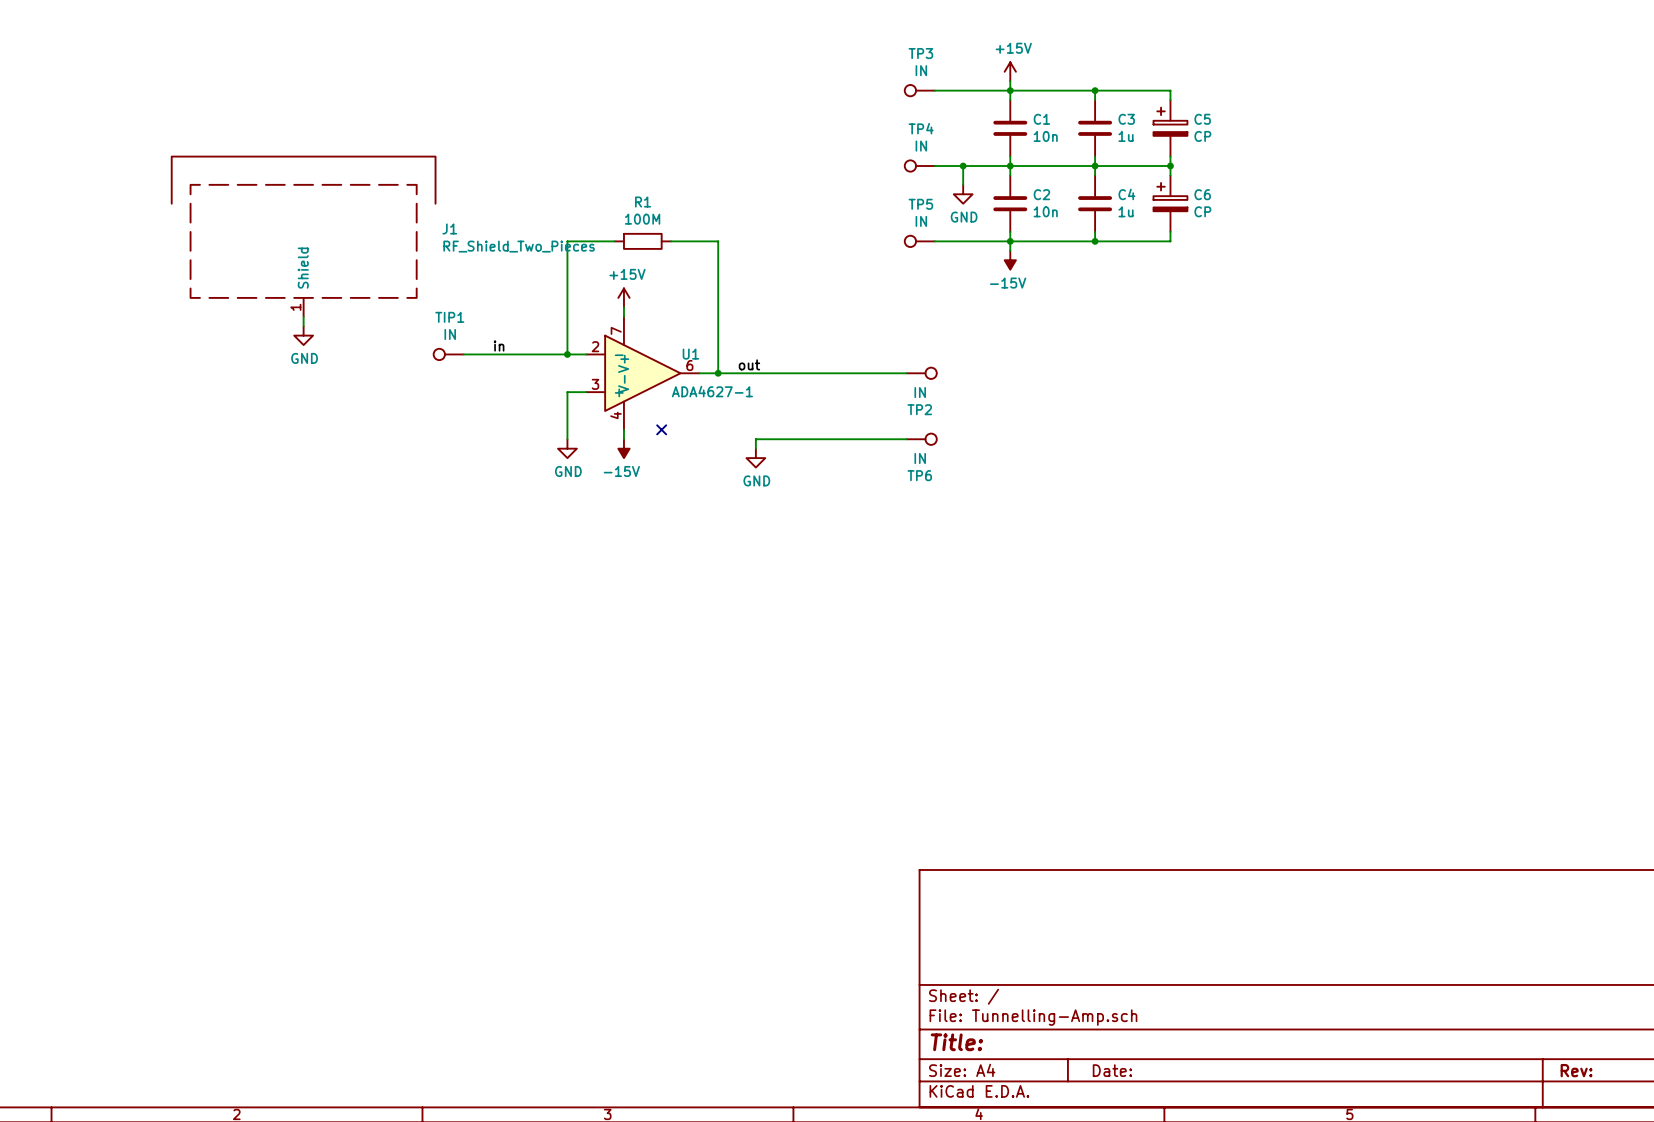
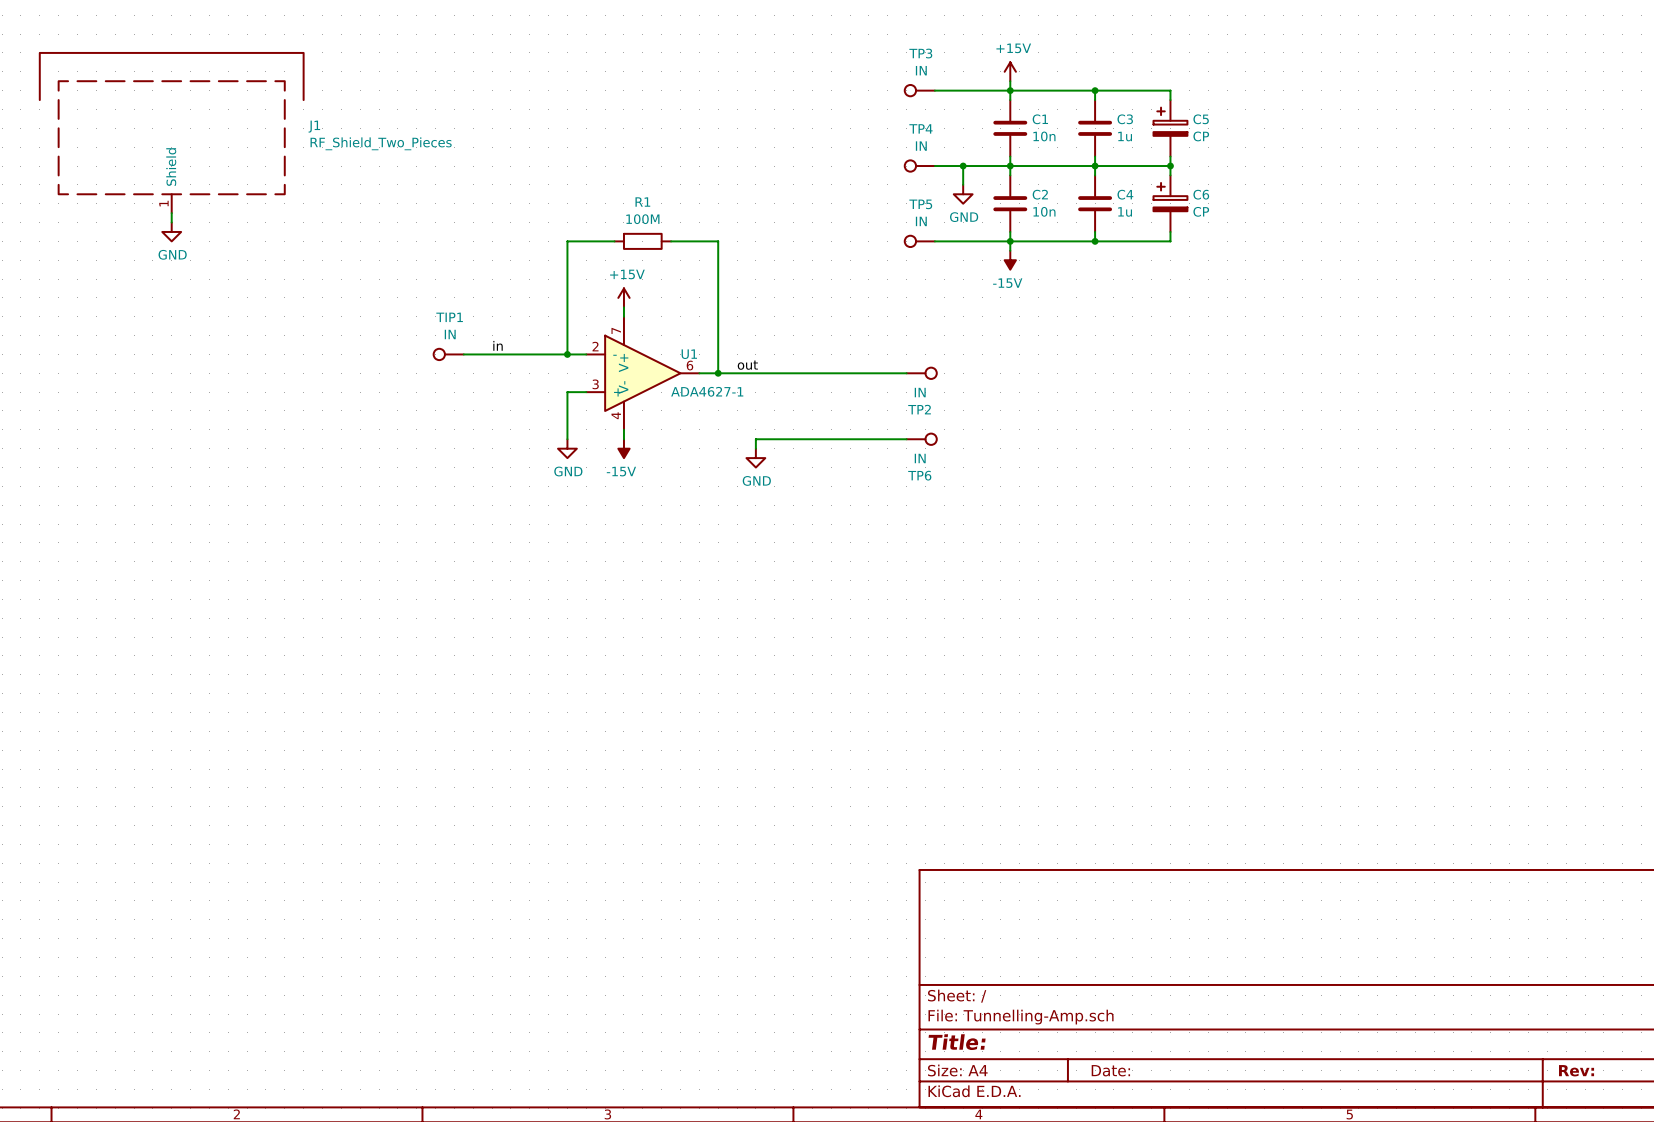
J1 position: (303, 236) -> (171, 132)
wire: (303, 316) (303, 326) -> (171, 213) (171, 222)
power symbol position: GND (303, 335) -> GND (171, 231)
no-connect mark: (661, 429) -> none

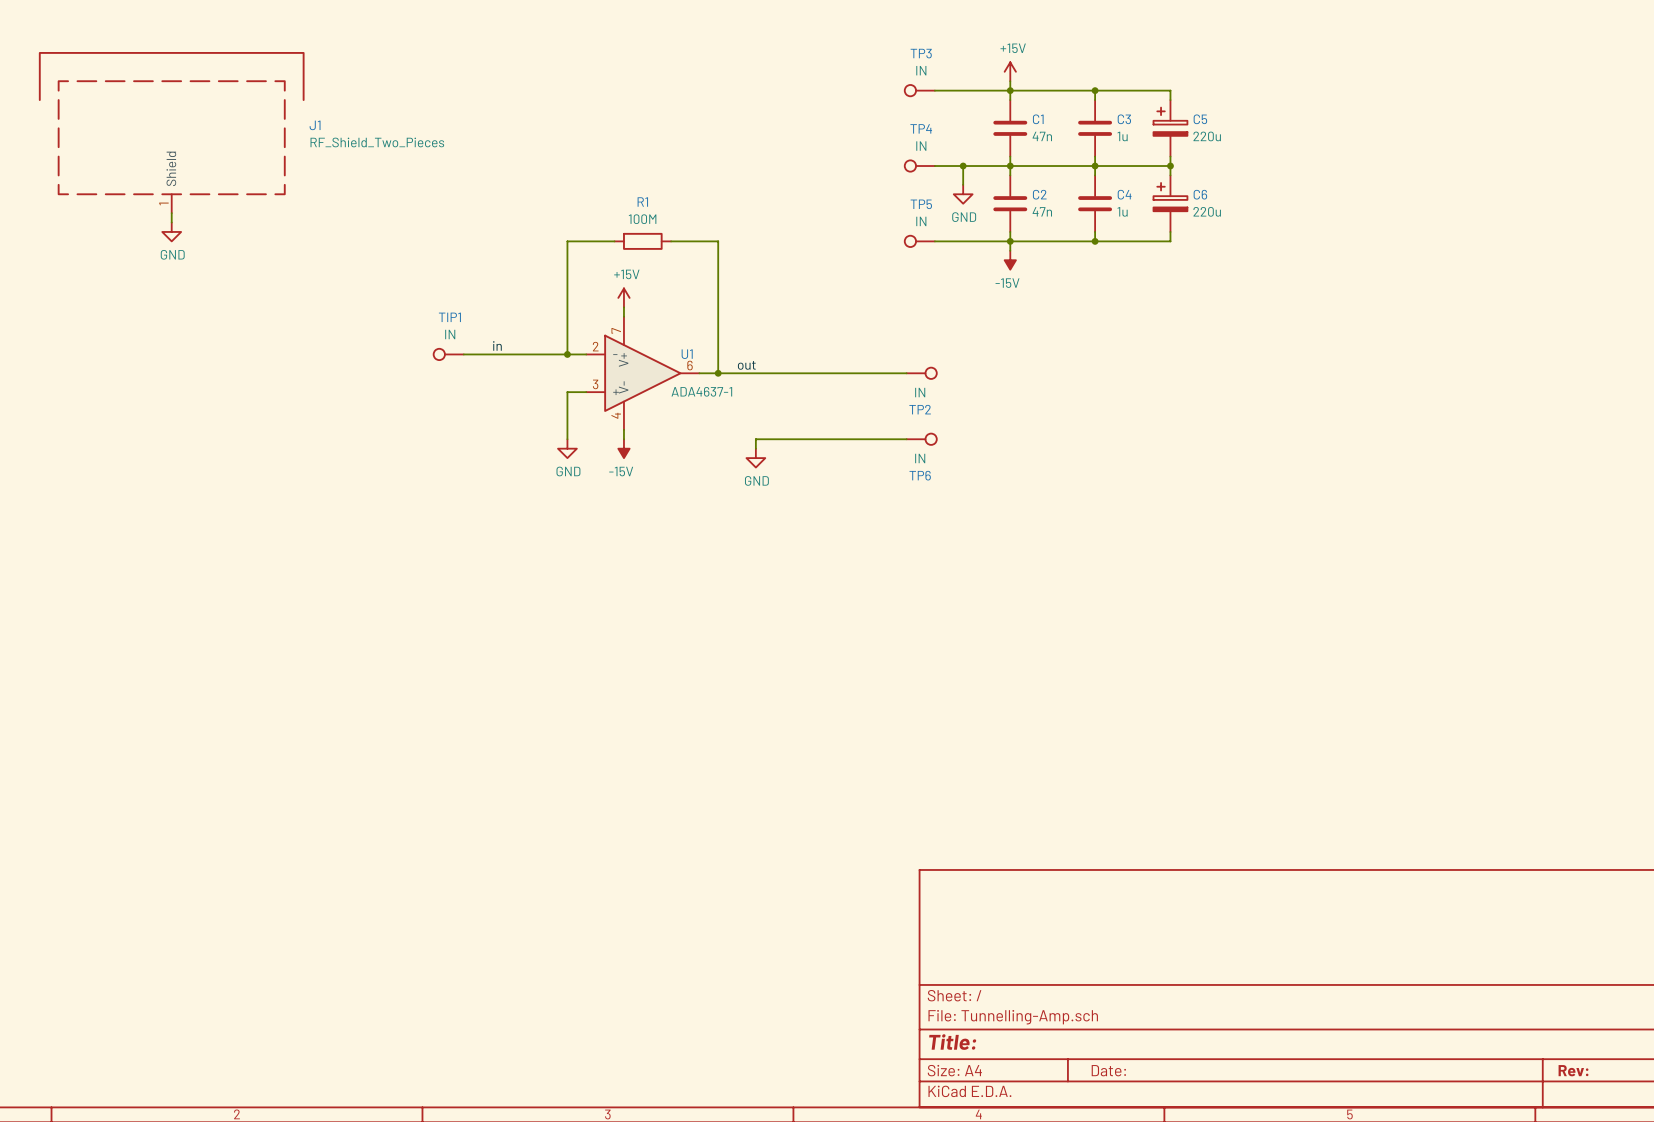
C1 value: 10n (1044, 136) -> 47n (1042, 136)
C5 value: CP (1201, 136) -> 220u (1207, 136)
C2 value: 10n (1044, 211) -> 47n (1042, 211)
C6 value: CP (1201, 211) -> 220u (1207, 211)
U1 value: ADA4627-1 (707, 391) -> ADA4637-1 (701, 391)

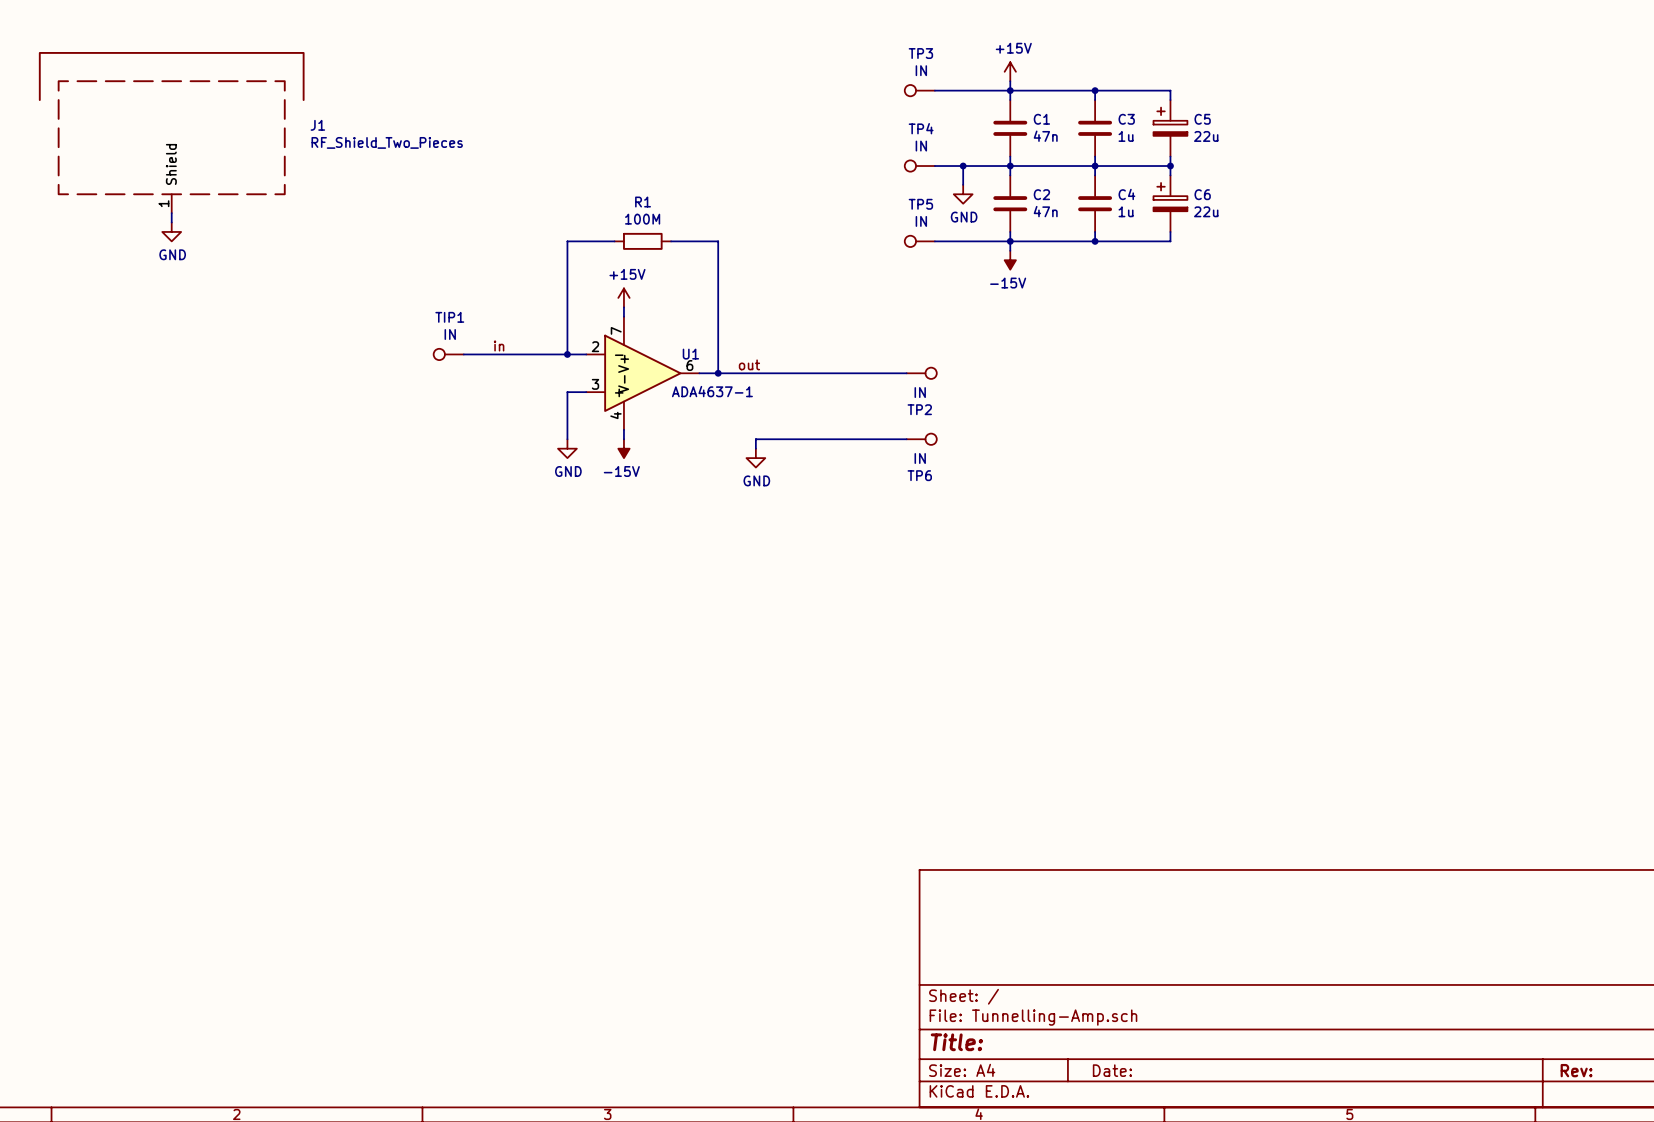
C5 value: 220u (1207, 136) -> 22u (1206, 136)
C6 value: 220u (1207, 211) -> 22u (1206, 211)

